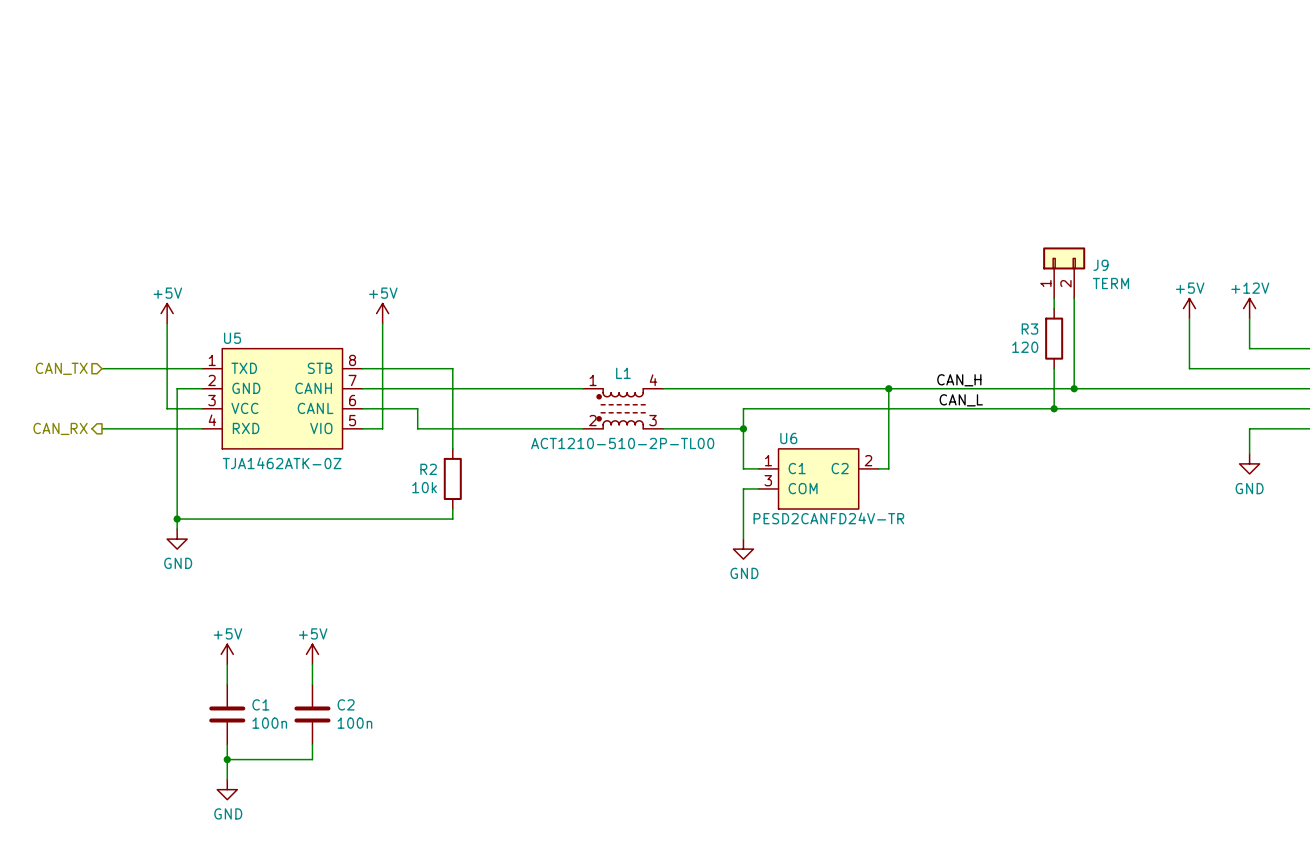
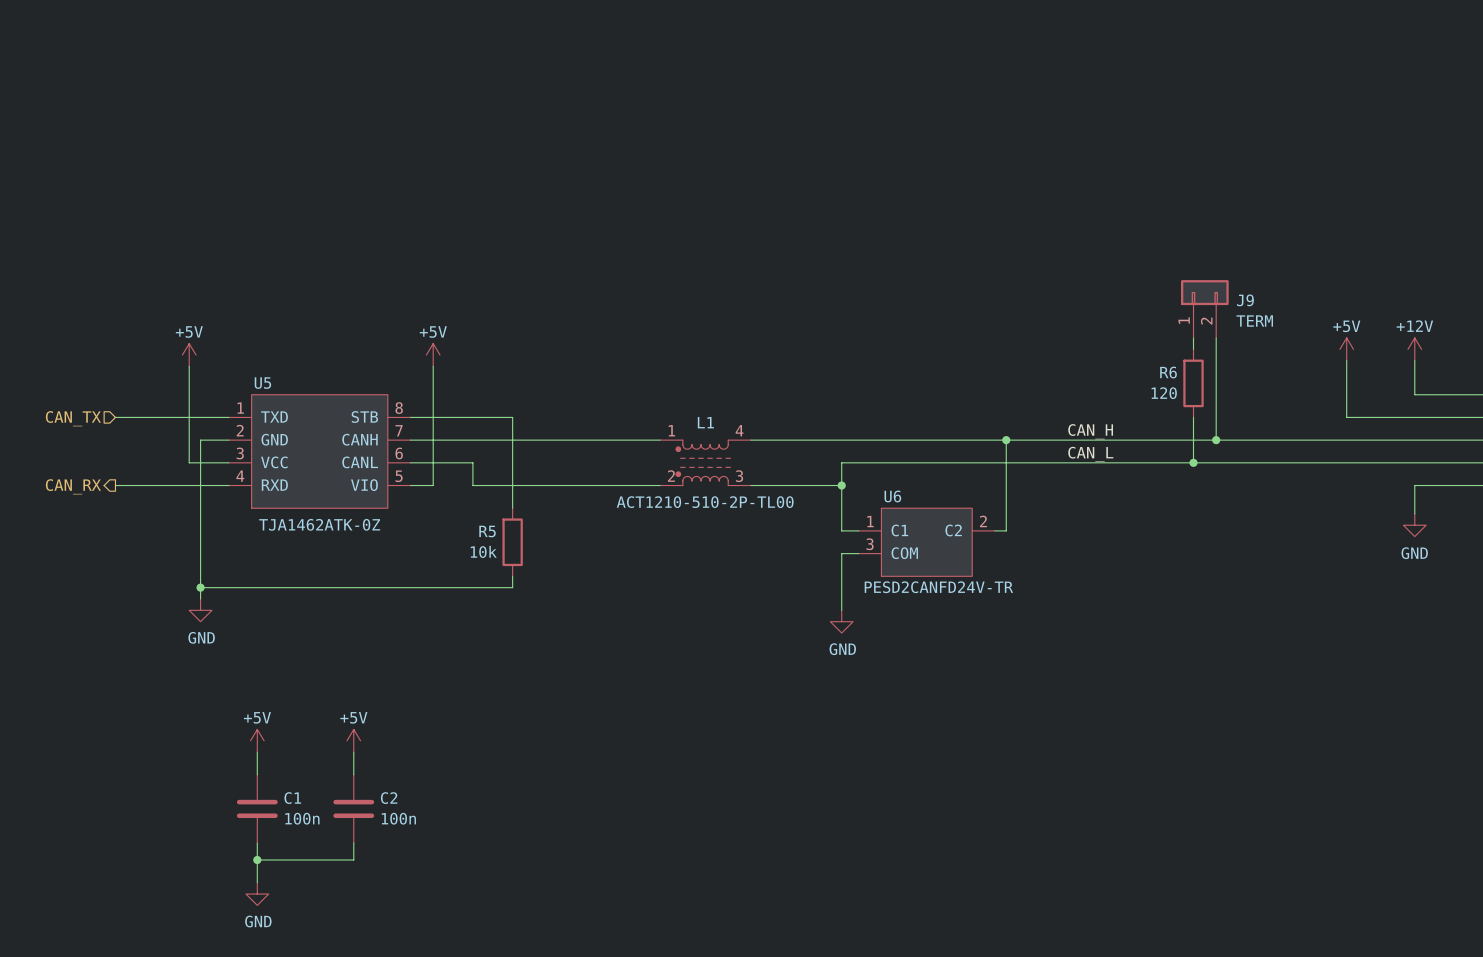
R3 name: R3 (1029, 329) -> R6 (1168, 372)
R2 name: R2 (428, 469) -> R5 (487, 531)

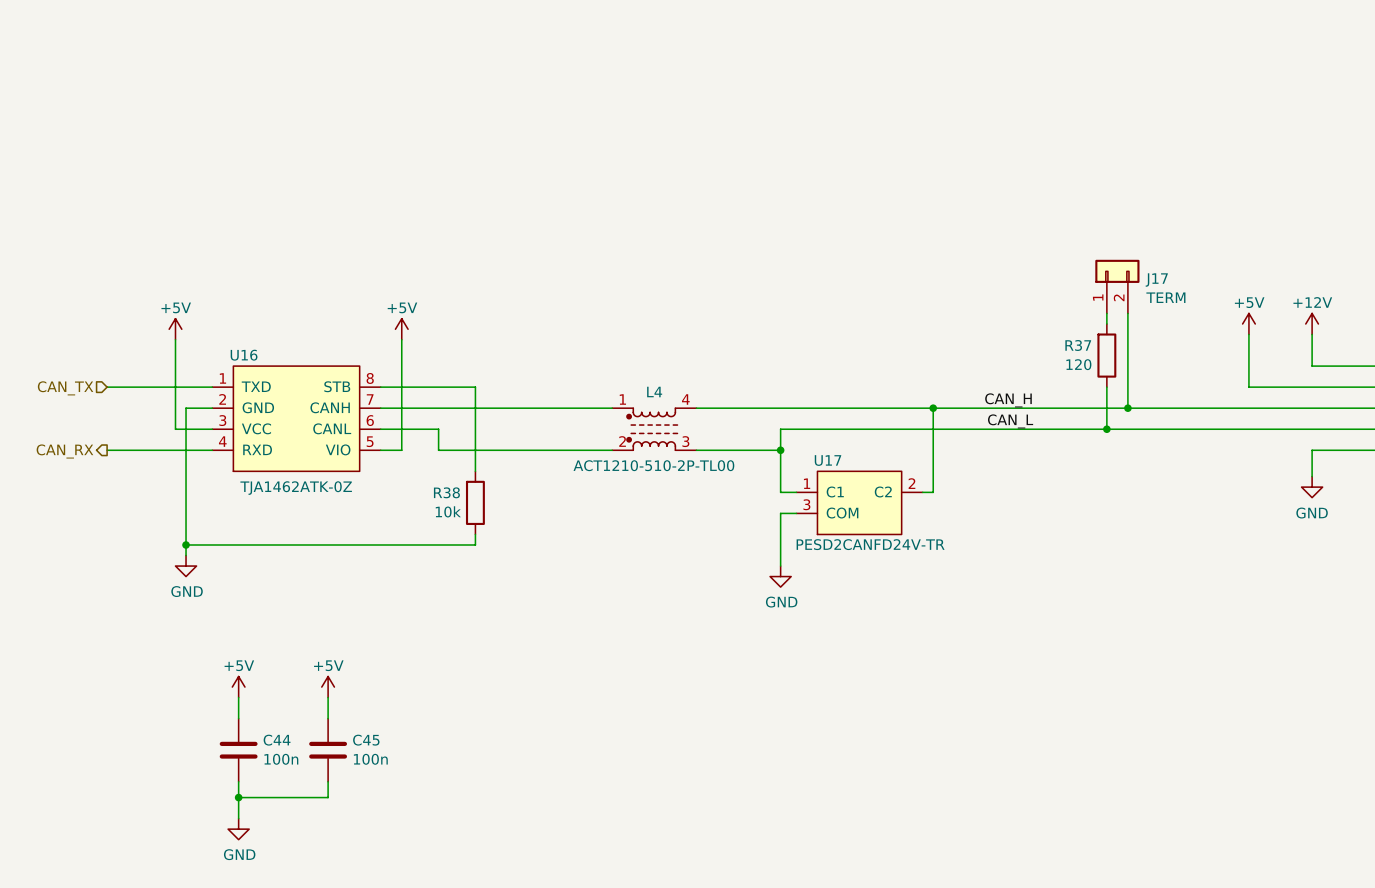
J9 name: J9 (1245, 300) -> J17 (1156, 280)
R6 name: R6 (1168, 372) -> R37 (1078, 345)
U5 name: U5 (262, 383) -> U16 (244, 355)
L1 name: L1 (705, 422) -> L4 (654, 392)
U6 name: U6 (892, 496) -> U17 (827, 460)
R5 name: R5 (487, 531) -> R38 (446, 492)
C1 name: C1 (292, 798) -> C44 (277, 740)
C2 name: C2 (389, 798) -> C45 (366, 740)

